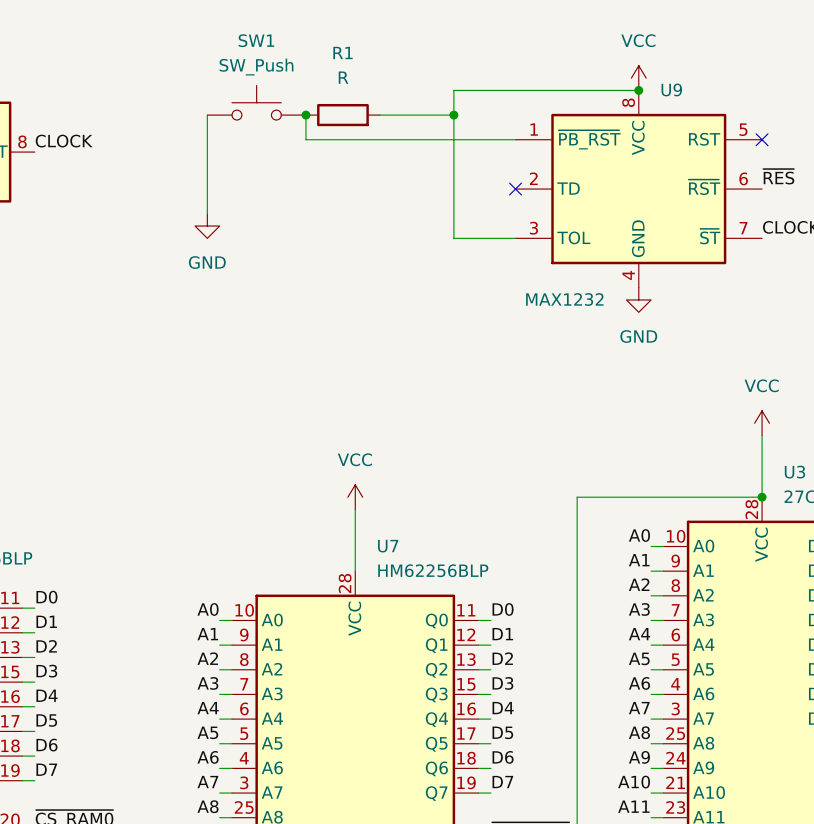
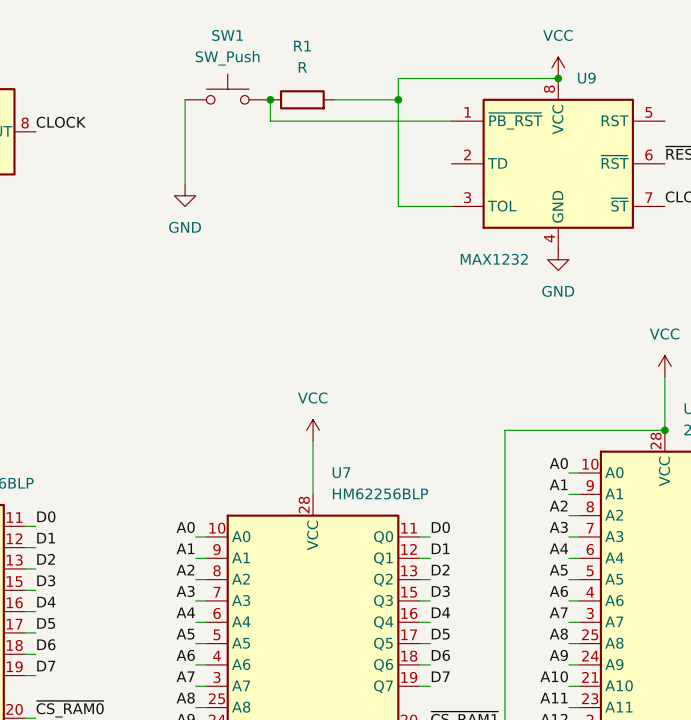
no-connect mark: (762, 139) -> none
no-connect mark: (515, 189) -> none

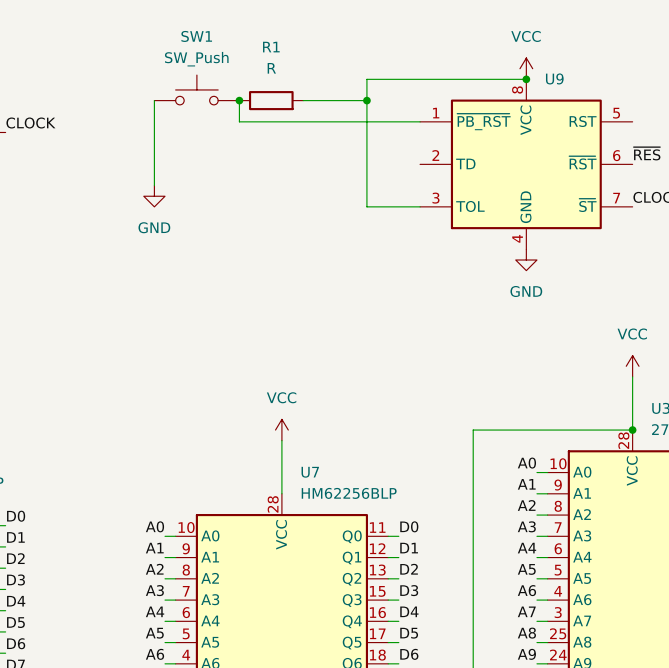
U9 value: MAX1232 (494, 259) -> none

